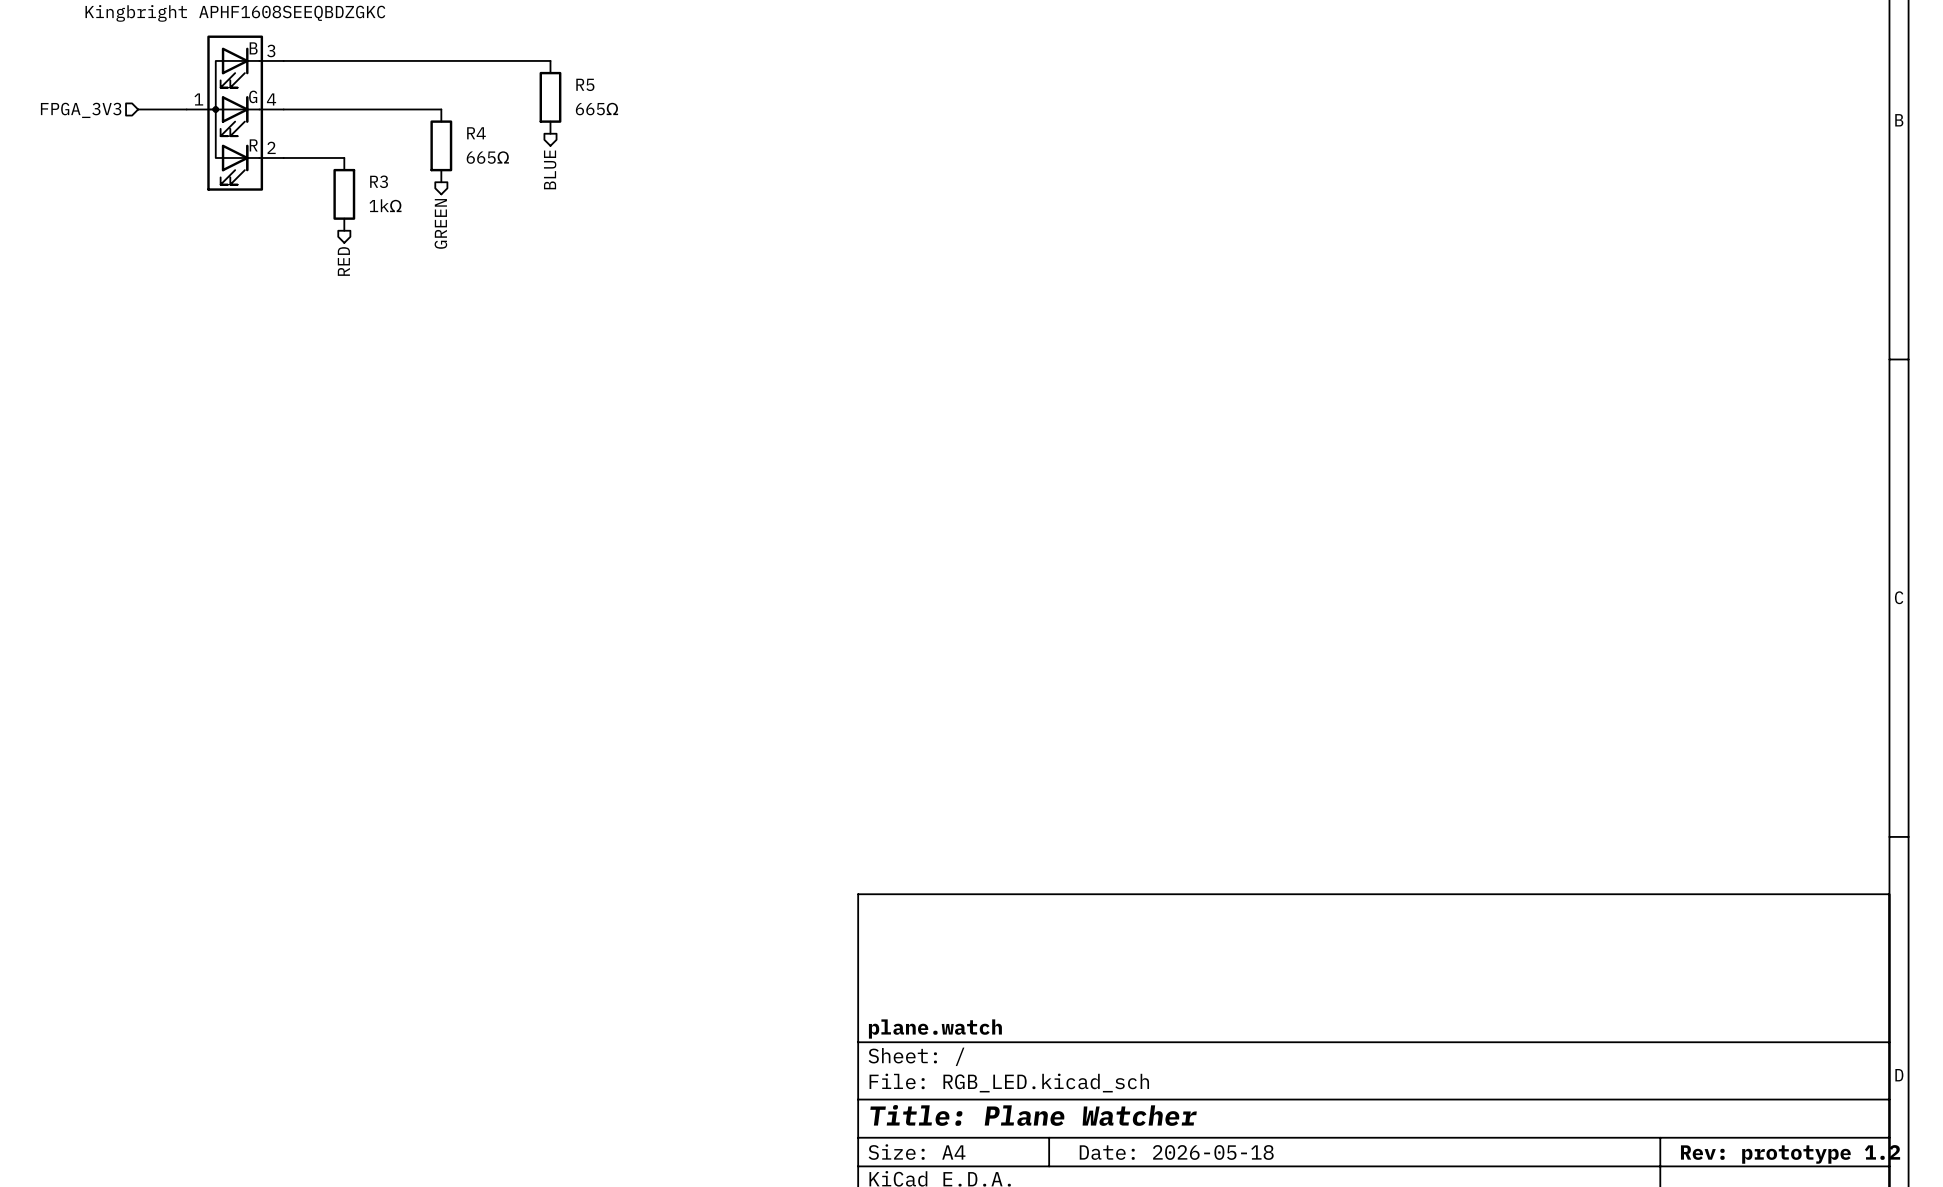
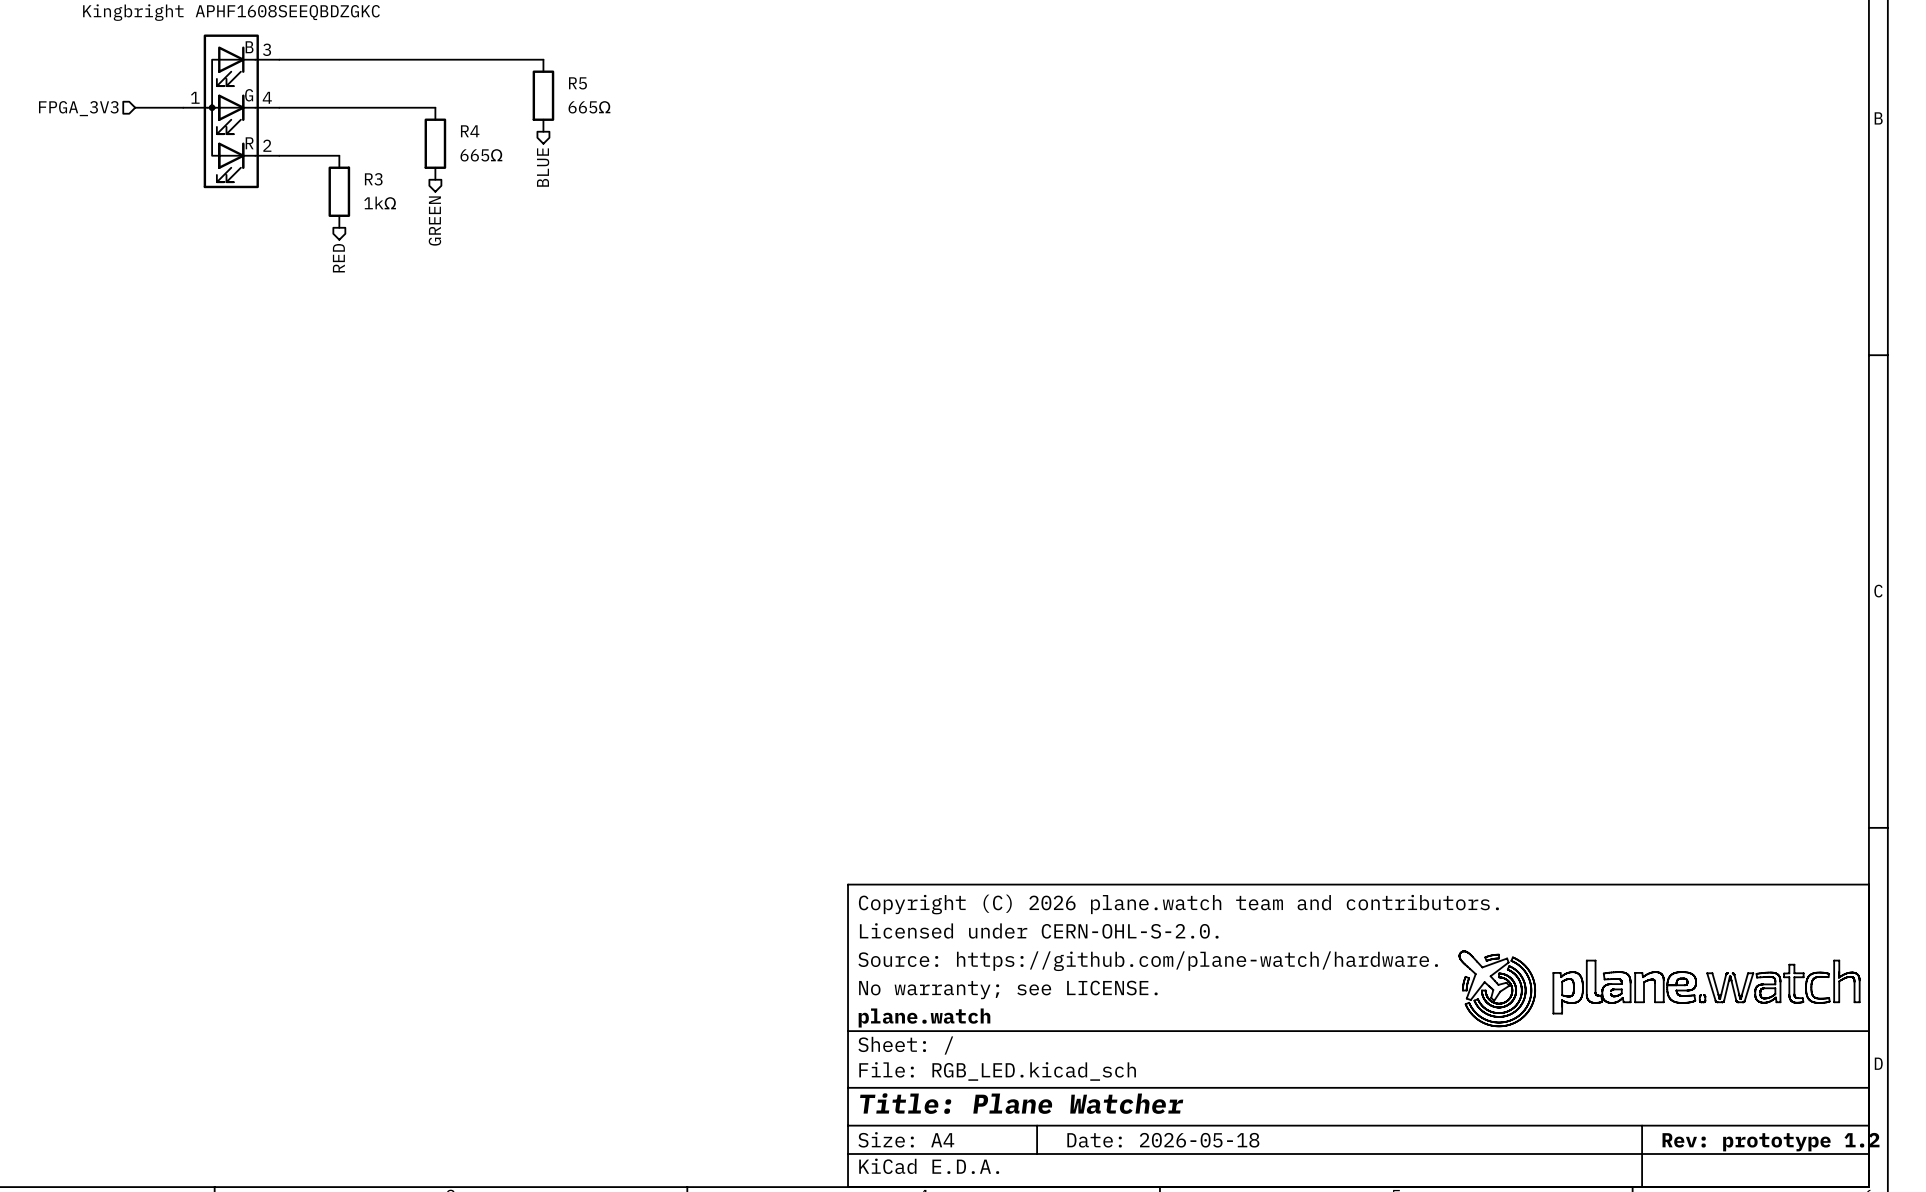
title block: none -> Copyright (C) 2026 plane.watch team and contributors. (1178, 904)
title block: none -> Licensed under CERN-OHL-S-2.0. (1039, 930)
line: none -> (1463, 951) (1459, 954) (1460, 958) (1475, 974) (1466, 998) (1470, 1000) (1484, 982) (1493, 989) (1491, 997) (1494, 1000) (1500, 991) (1509, 985) (1506, 982) (1498, 984) (1490, 976) (1508, 962) (1507, 958) (1482, 967) (1470, 954) (1463, 951)
line: none -> (1497, 954) (1491, 955) (1485, 957) (1486, 960) (1499, 958) (1499, 954) (1497, 954)
line: none -> (1512, 957) (1511, 960) (1522, 968) (1529, 980) (1531, 992) (1528, 1003) (1516, 1017) (1499, 1022) (1483, 1018) (1475, 1012) (1469, 1002) (1465, 1004) (1473, 1015) (1484, 1023) (1498, 1026) (1512, 1023) (1524, 1015) (1532, 1004) (1535, 990) (1532, 976) (1524, 965) (1512, 957)
title block: none -> Source: https://github.com/plane-watch/hardware. (1148, 961)
line: none -> (1834, 960) (1839, 960) (1838, 977) (1850, 972) (1858, 975) (1859, 1002) (1854, 1002) (1854, 980) (1850, 976) (1839, 981) (1839, 1002) (1834, 1002) (1834, 960)
line: none -> (1509, 966) (1507, 969) (1515, 975) (1520, 983) (1519, 999) (1511, 1009) (1499, 1013) (1486, 1009) (1477, 999) (1474, 1000) (1479, 1008) (1488, 1014) (1498, 1016) (1508, 1015) (1517, 1009) (1523, 1001) (1525, 991) (1523, 980) (1517, 971) (1509, 966)
line: none -> (1572, 972) (1561, 977) (1560, 972) (1553, 972) (1553, 1013) (1562, 1013) (1561, 1000) (1574, 1002) (1581, 997) (1581, 978) (1577, 973) (1572, 972)
line: none -> (1768, 972) (1756, 973) (1757, 977) (1772, 977) (1775, 984) (1757, 985) (1755, 989) (1755, 998) (1758, 1001) (1764, 1002) (1775, 997) (1776, 1002) (1780, 1002) (1779, 976) (1776, 973) (1768, 972)
line: none -> (1818, 972) (1811, 974) (1807, 978) (1807, 996) (1814, 1002) (1829, 1001) (1829, 998) (1817, 998) (1812, 994) (1811, 984) (1813, 979) (1818, 976) (1828, 977) (1829, 973) (1818, 972)
line: none -> (1499, 973) (1499, 977) (1506, 979) (1511, 986) (1512, 993) (1508, 999) (1501, 1003) (1494, 1002) (1488, 998) (1485, 990) (1481, 990) (1486, 1002) (1499, 1007) (1511, 1002) (1516, 990) (1511, 978) (1499, 973)
line: none -> (1726, 974) (1719, 998) (1712, 973) (1707, 973) (1715, 1000)
line: none -> (1734, 974) (1741, 998) (1748, 973) (1753, 973) (1744, 1000)
line: none -> (1465, 976) (1463, 983) (1462, 990) (1466, 990) (1469, 978) (1465, 976)
line: none -> (1568, 979) (1573, 981) (1573, 994) (1570, 996) (1562, 995) (1562, 981) (1568, 979)
line: none -> (1686, 979) (1678, 979) (1676, 985)
line: none -> (1620, 979) (1604, 979) (1603, 973) (1620, 972) (1628, 975) (1630, 981) (1630, 1002) (1623, 1002) (1622, 997) (1614, 1002) (1605, 1000) (1602, 995) (1603, 986) (1608, 984) (1621, 984) (1621, 980)
line: none -> (1653, 979) (1643, 982) (1643, 1002) (1635, 1002) (1635, 972) (1642, 972) (1642, 977) (1655, 972) (1660, 973) (1663, 977) (1663, 1002) (1655, 1002) (1654, 981)
line: none -> (1687, 980) (1687, 983)
line: none -> (1667, 985) (1668, 995) (1672, 1000) (1682, 1002) (1695, 1000) (1694, 995) (1680, 995) (1676, 990) (1694, 988) (1695, 979) (1691, 973) (1682, 972) (1673, 973) (1669, 977) (1667, 985)
line: none -> (1685, 985) (1667, 985)
line: none -> (1762, 988) (1775, 988) (1775, 994) (1763, 998) (1760, 996) (1760, 990)
title block: none -> No warranty; see LICENSE. (1008, 989)
line: none -> (1613, 989) (1621, 989) (1621, 993) (1613, 996)
line: none -> (1595, 992) (1595, 960) (1586, 960) (1587, 997) (1592, 1002) (1602, 1001) (1601, 995) (1598, 995)
line: none -> (1699, 996) (1699, 1000)
line: none -> (1705, 996) (1705, 1000)
line: none -> (1794, 996) (1794, 977) (1803, 977) (1803, 973) (1794, 973) (1794, 964) (1789, 964) (1789, 973) (1784, 973) (1784, 977) (1789, 977) (1789, 998) (1794, 1002) (1803, 1002) (1802, 998) (1796, 997)
line: none -> (1724, 1000) (1729, 976) (1736, 1000)
line: none -> (1701, 1002) (1703, 1002)
line: none -> (1717, 1002) (1722, 1002)
line: none -> (1738, 1002) (1742, 1002)

